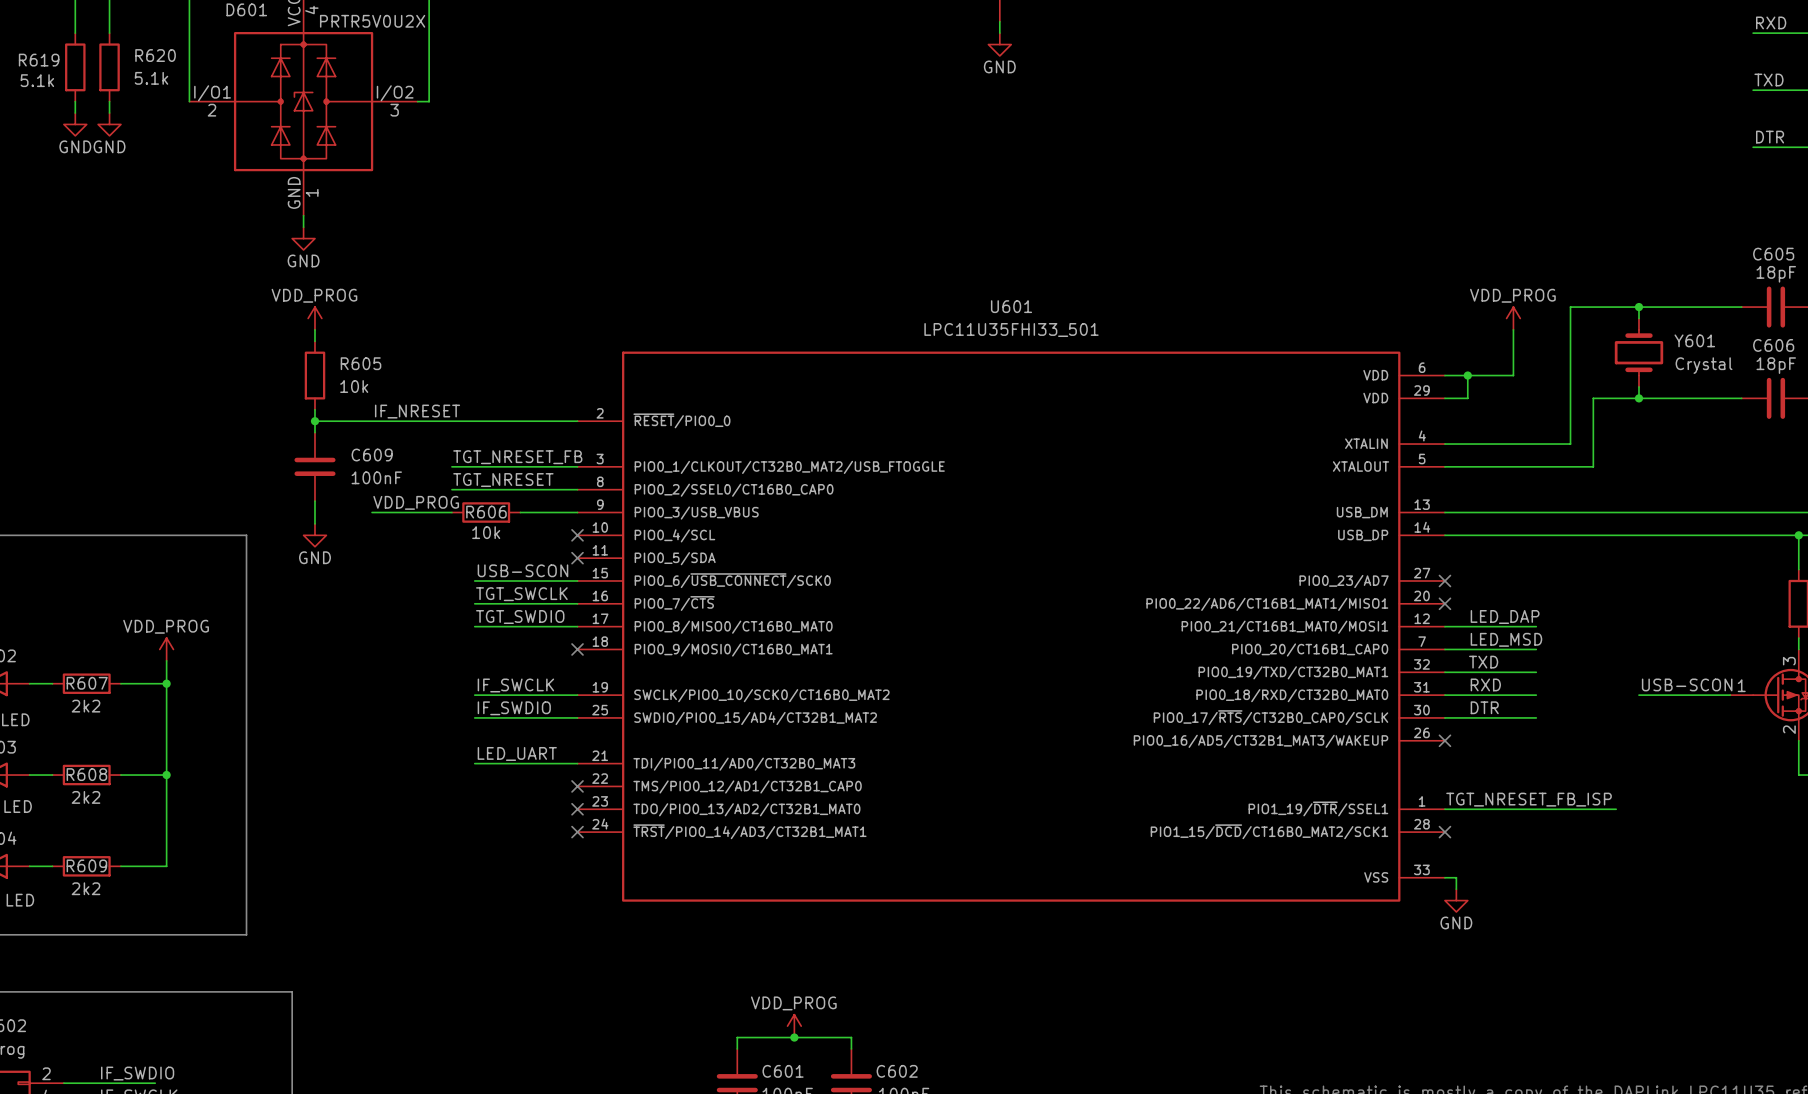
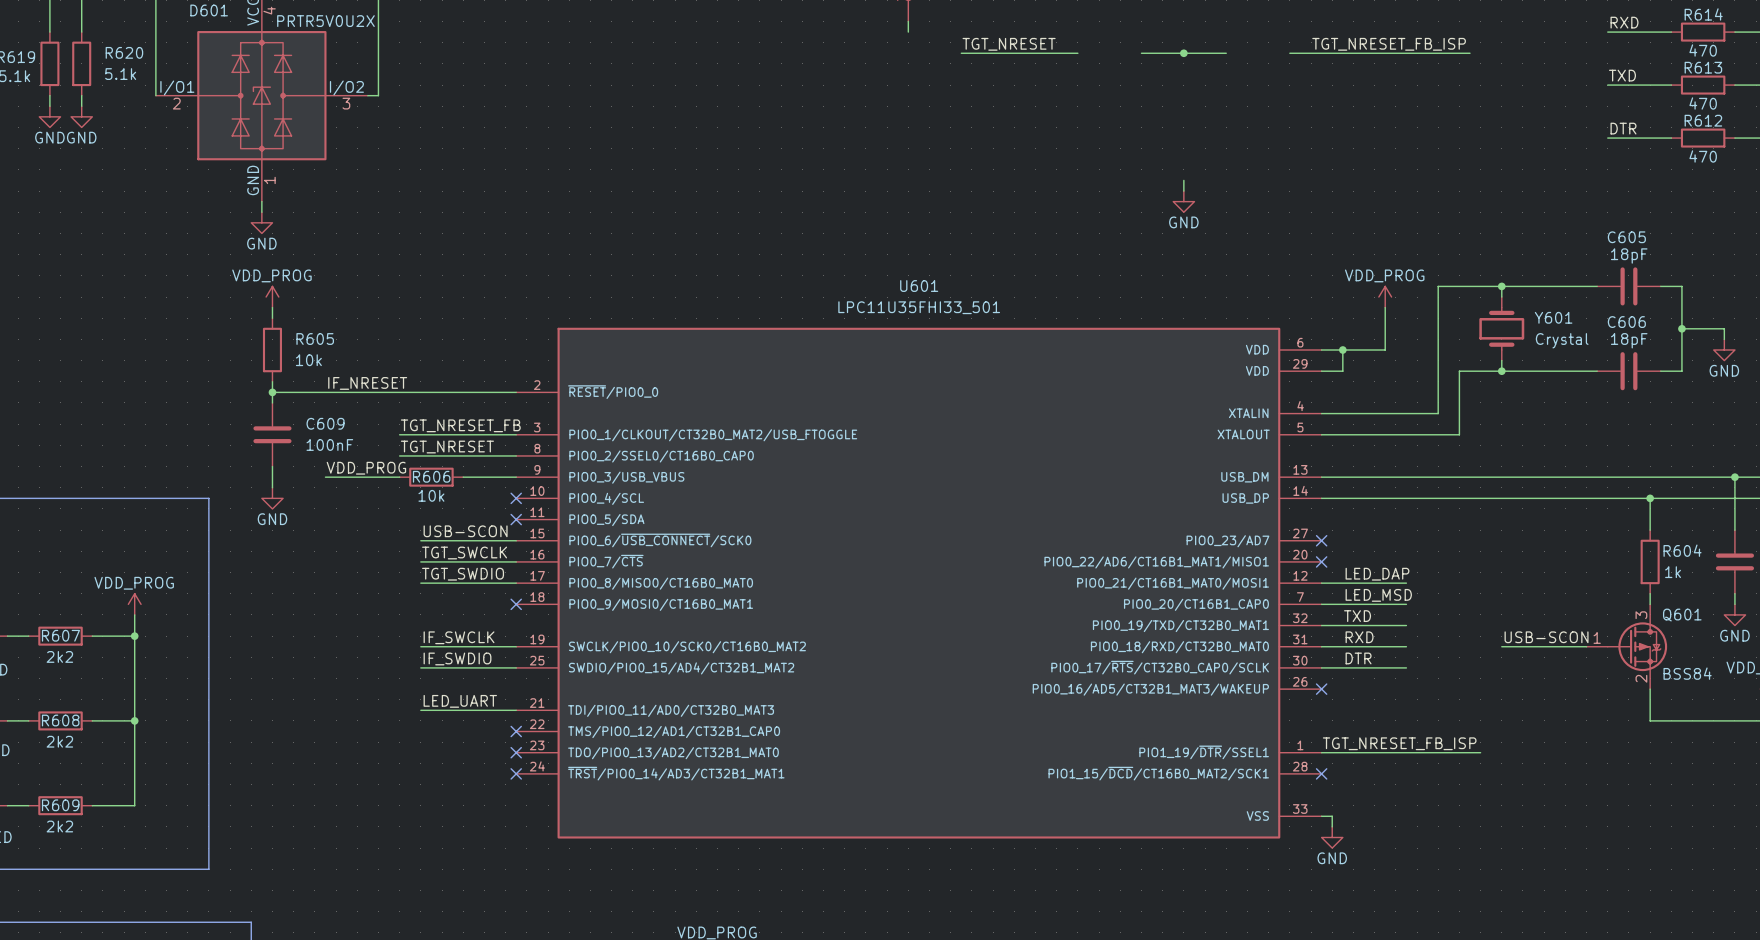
power symbol: GND (999, 44) -> none
label: none -> TGT_NRESET (1009, 44)
label: none -> TGT_NRESET_FB_ISP (1389, 44)
wire: none -> (961, 53) (1077, 53)
wire: none -> (1141, 53) (1226, 53)
junction: none -> (1183, 53)
wire: none -> (1289, 53) (1470, 53)
wire: none -> (1183, 180) (1183, 191)
power symbol: none -> GND (1183, 201)

